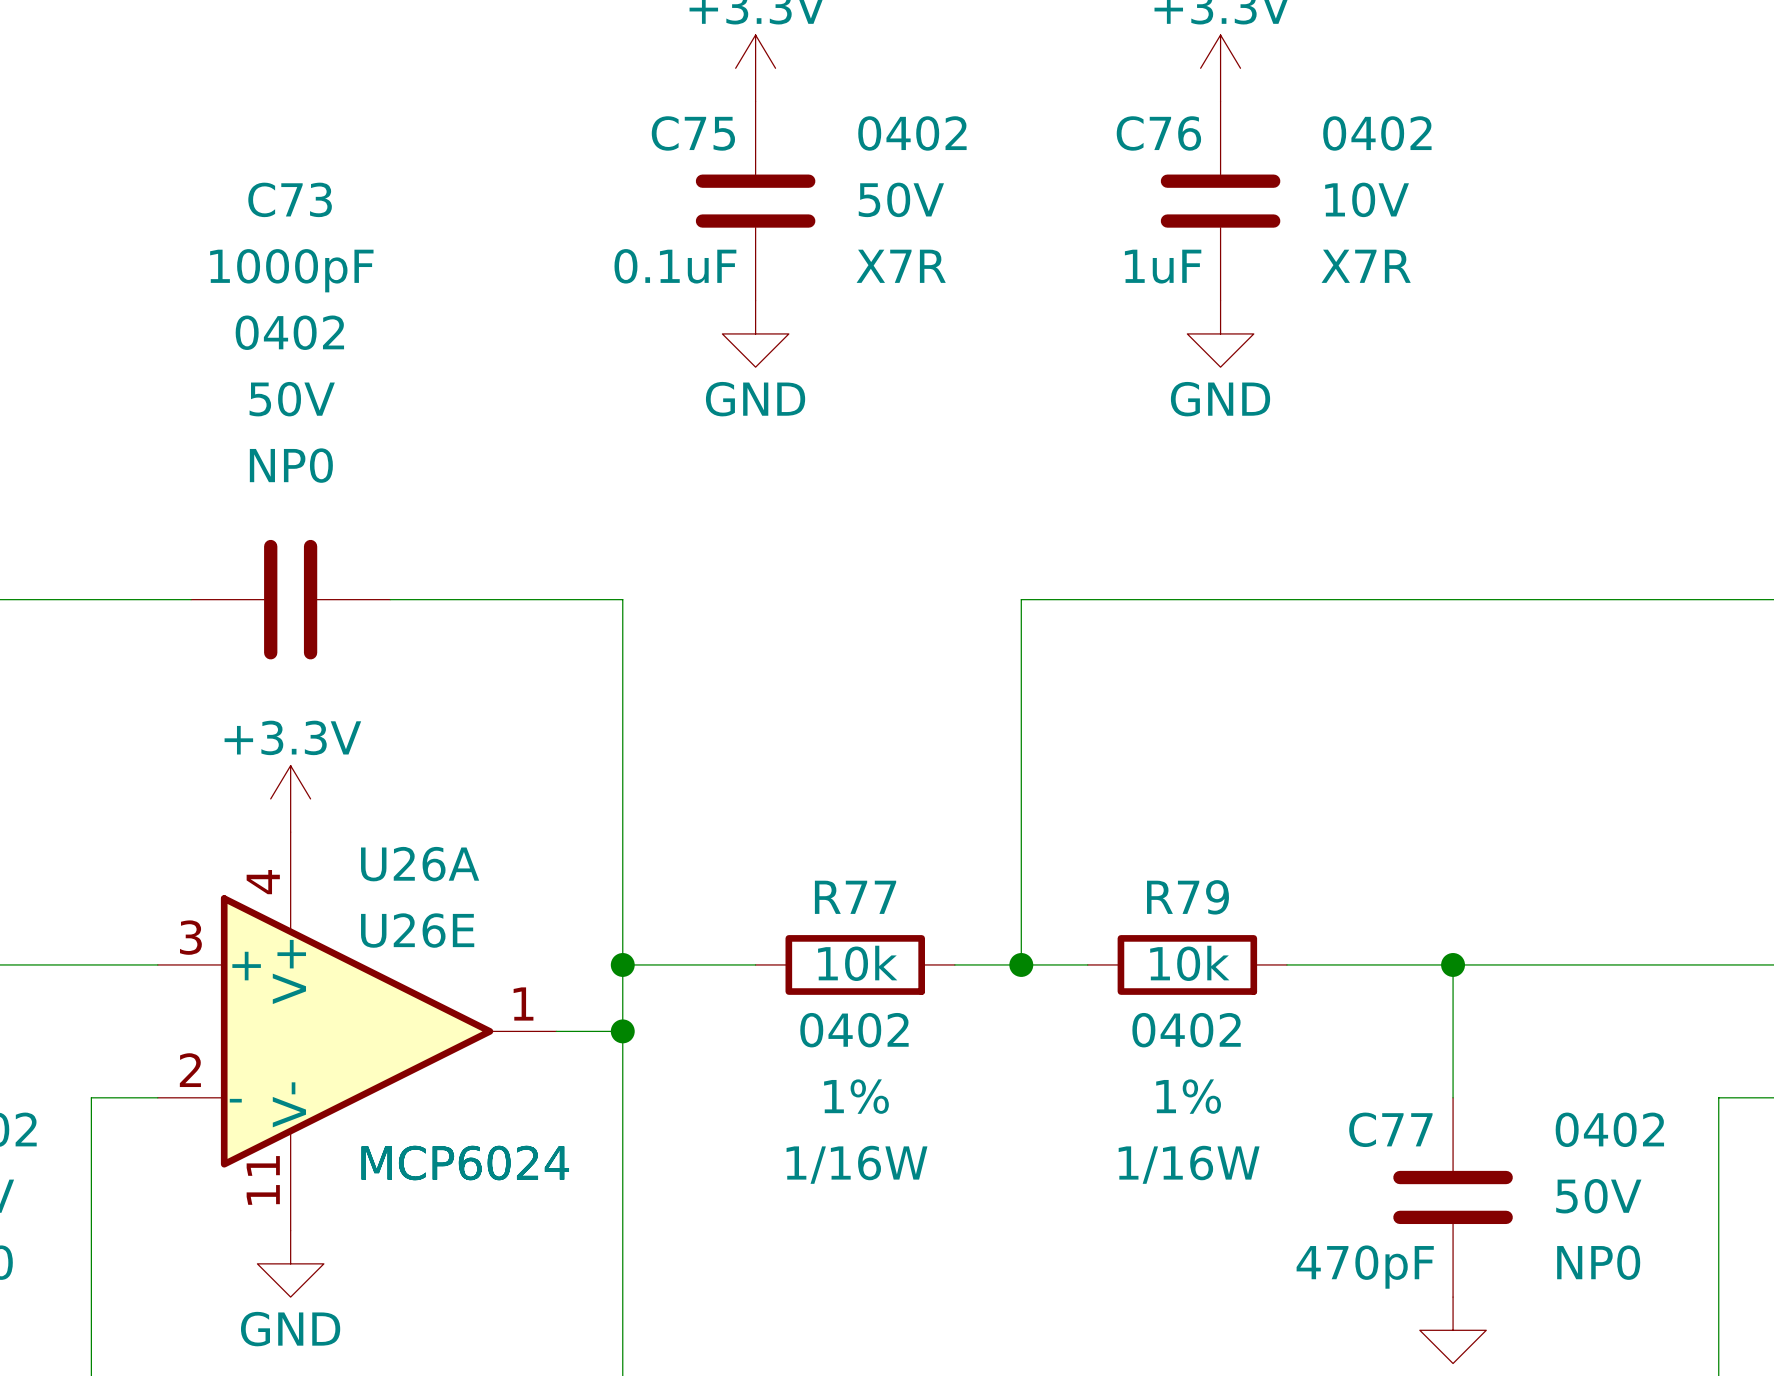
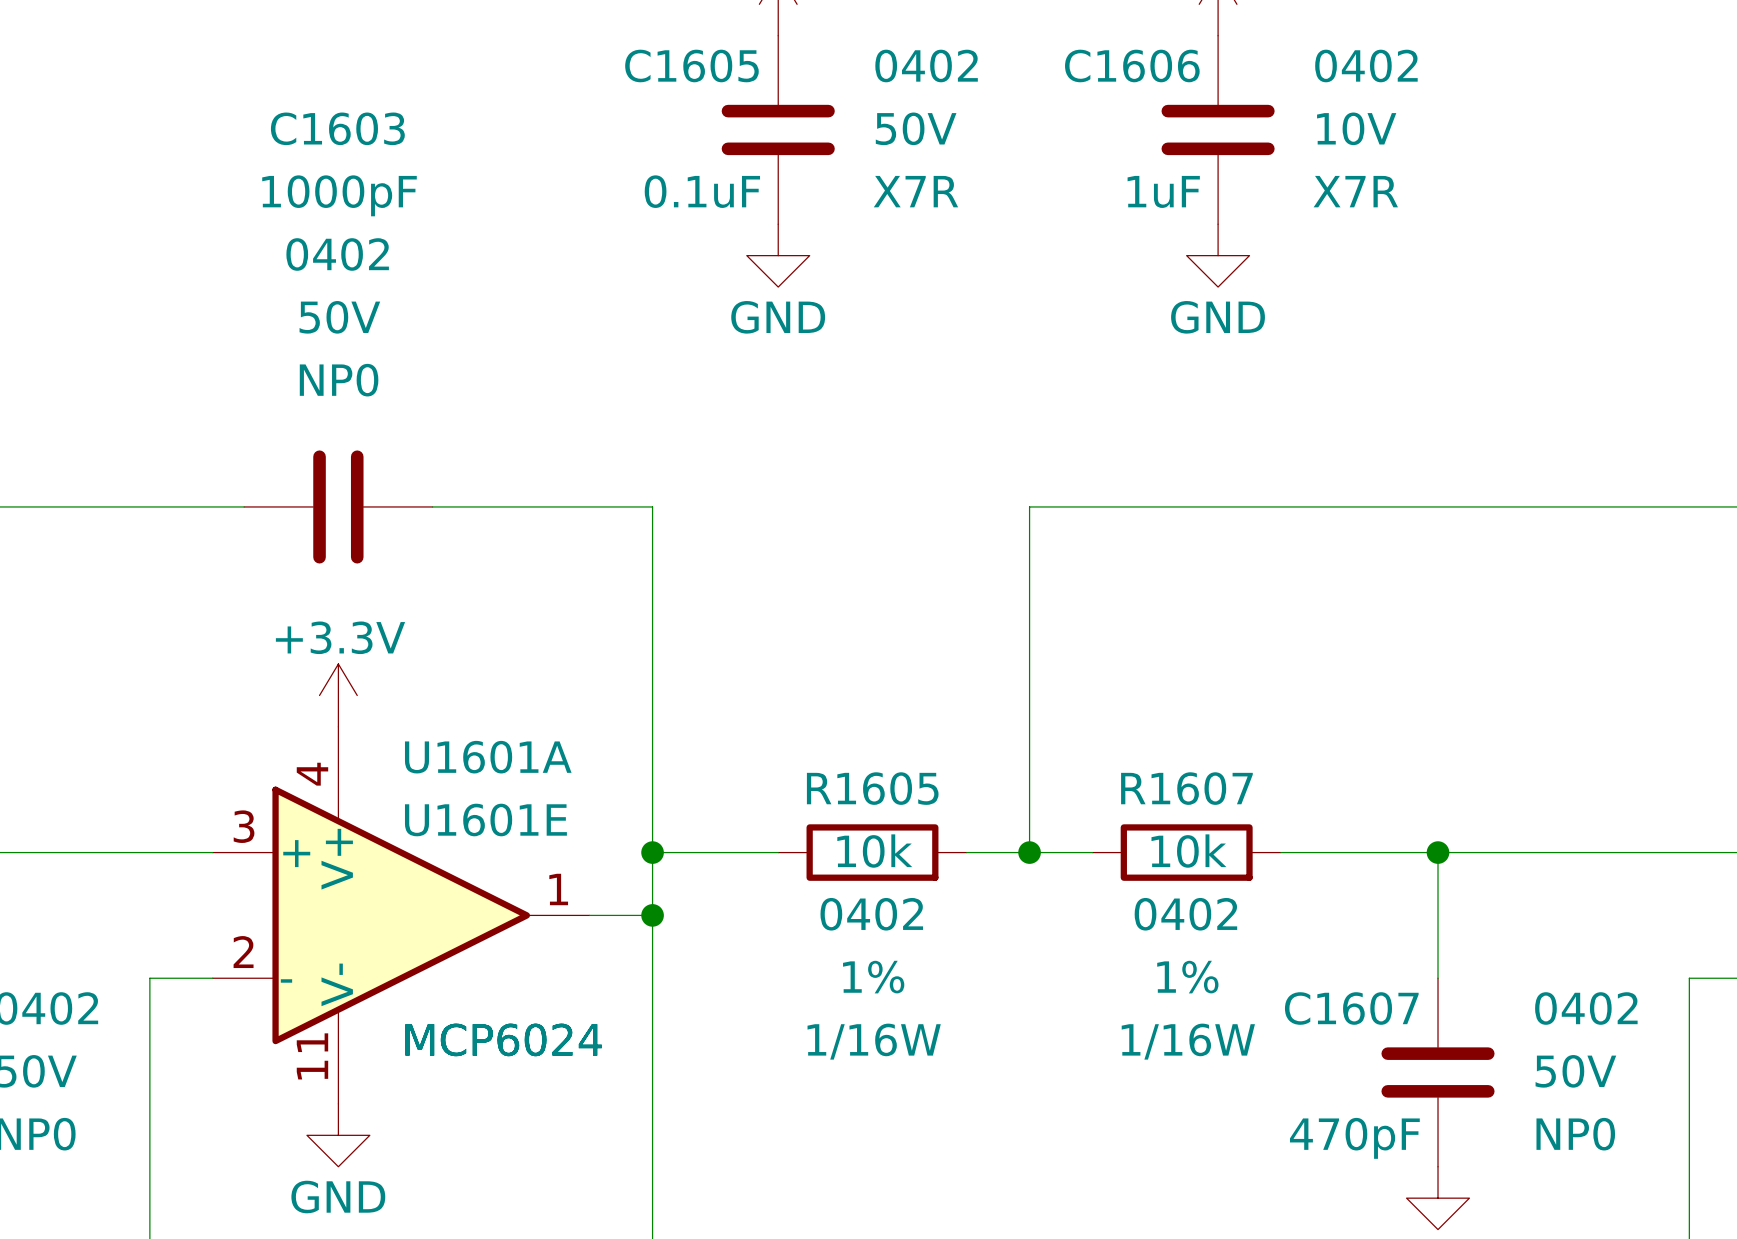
C75 name: C75 (693, 133) -> C1605 (691, 65)
C76 name: C76 (1158, 133) -> C1606 (1132, 65)
C73 name: C73 (290, 199) -> C1603 (337, 128)
U26A name: U26A (420, 864) -> U1601A (488, 757)
R77 name: R77 (855, 897) -> R1605 (872, 788)
R79 name: R79 (1187, 897) -> R1607 (1186, 788)
U26E name: U26E (417, 930) -> U1601E (485, 820)
C77 name: C77 (1390, 1129) -> C1607 (1351, 1008)

